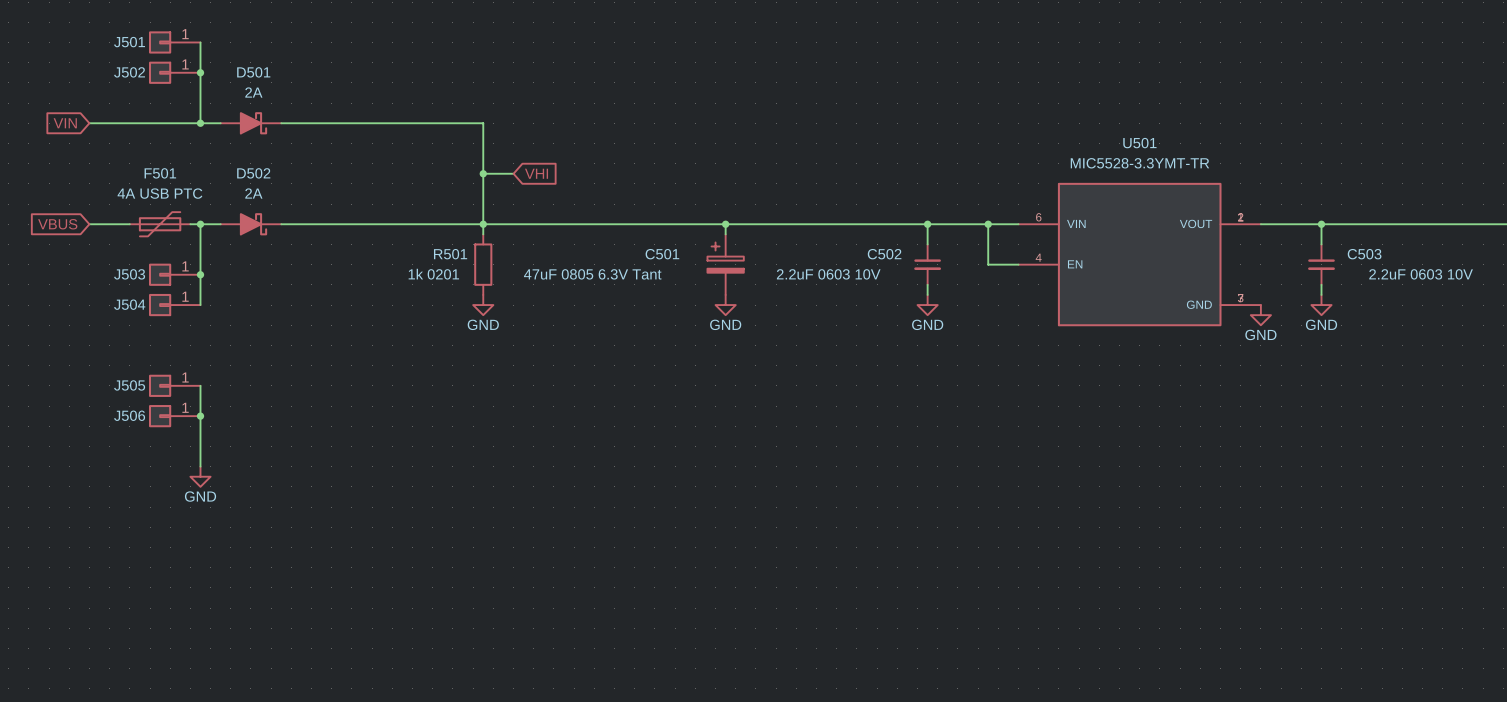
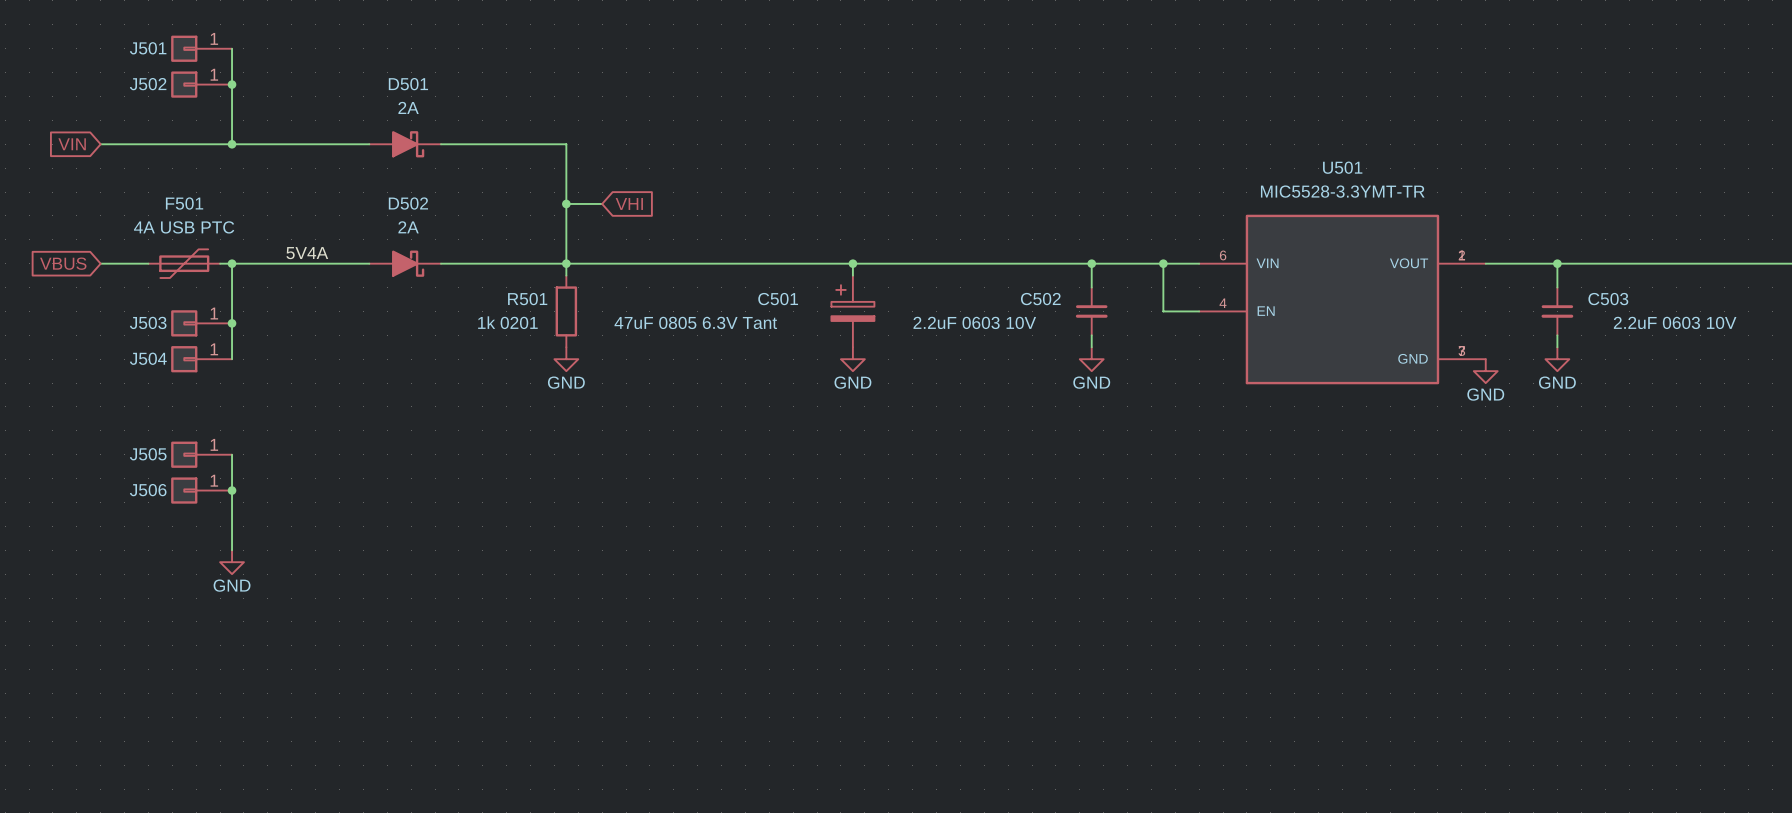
D501 position: (250, 123) -> (405, 144)
label: none -> 5V4A (307, 253)
D502 position: (250, 224) -> (405, 263)

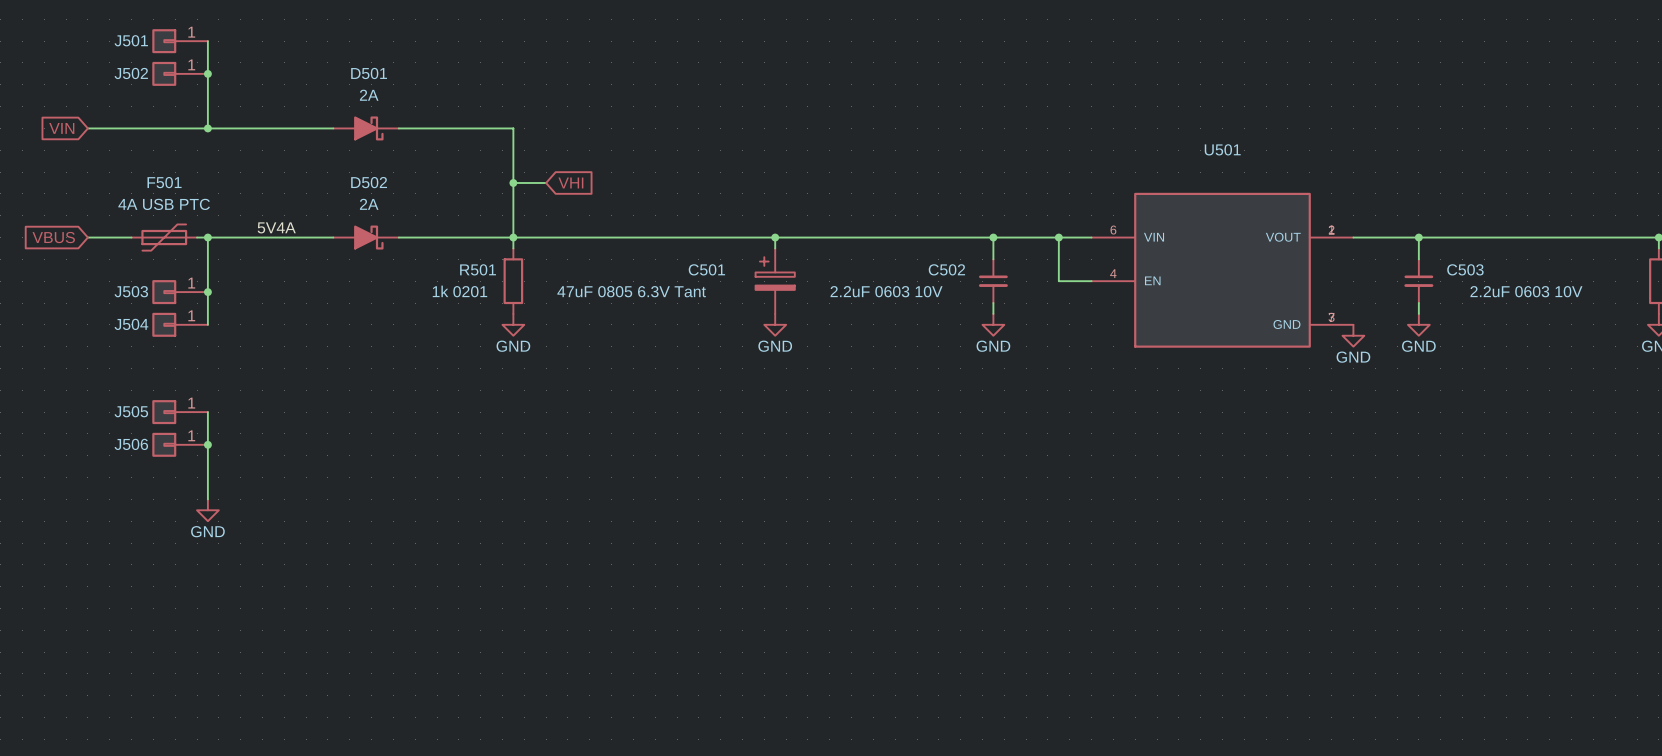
U501 value: MIC5528-3.3YMT-TR (1342, 191) -> none

